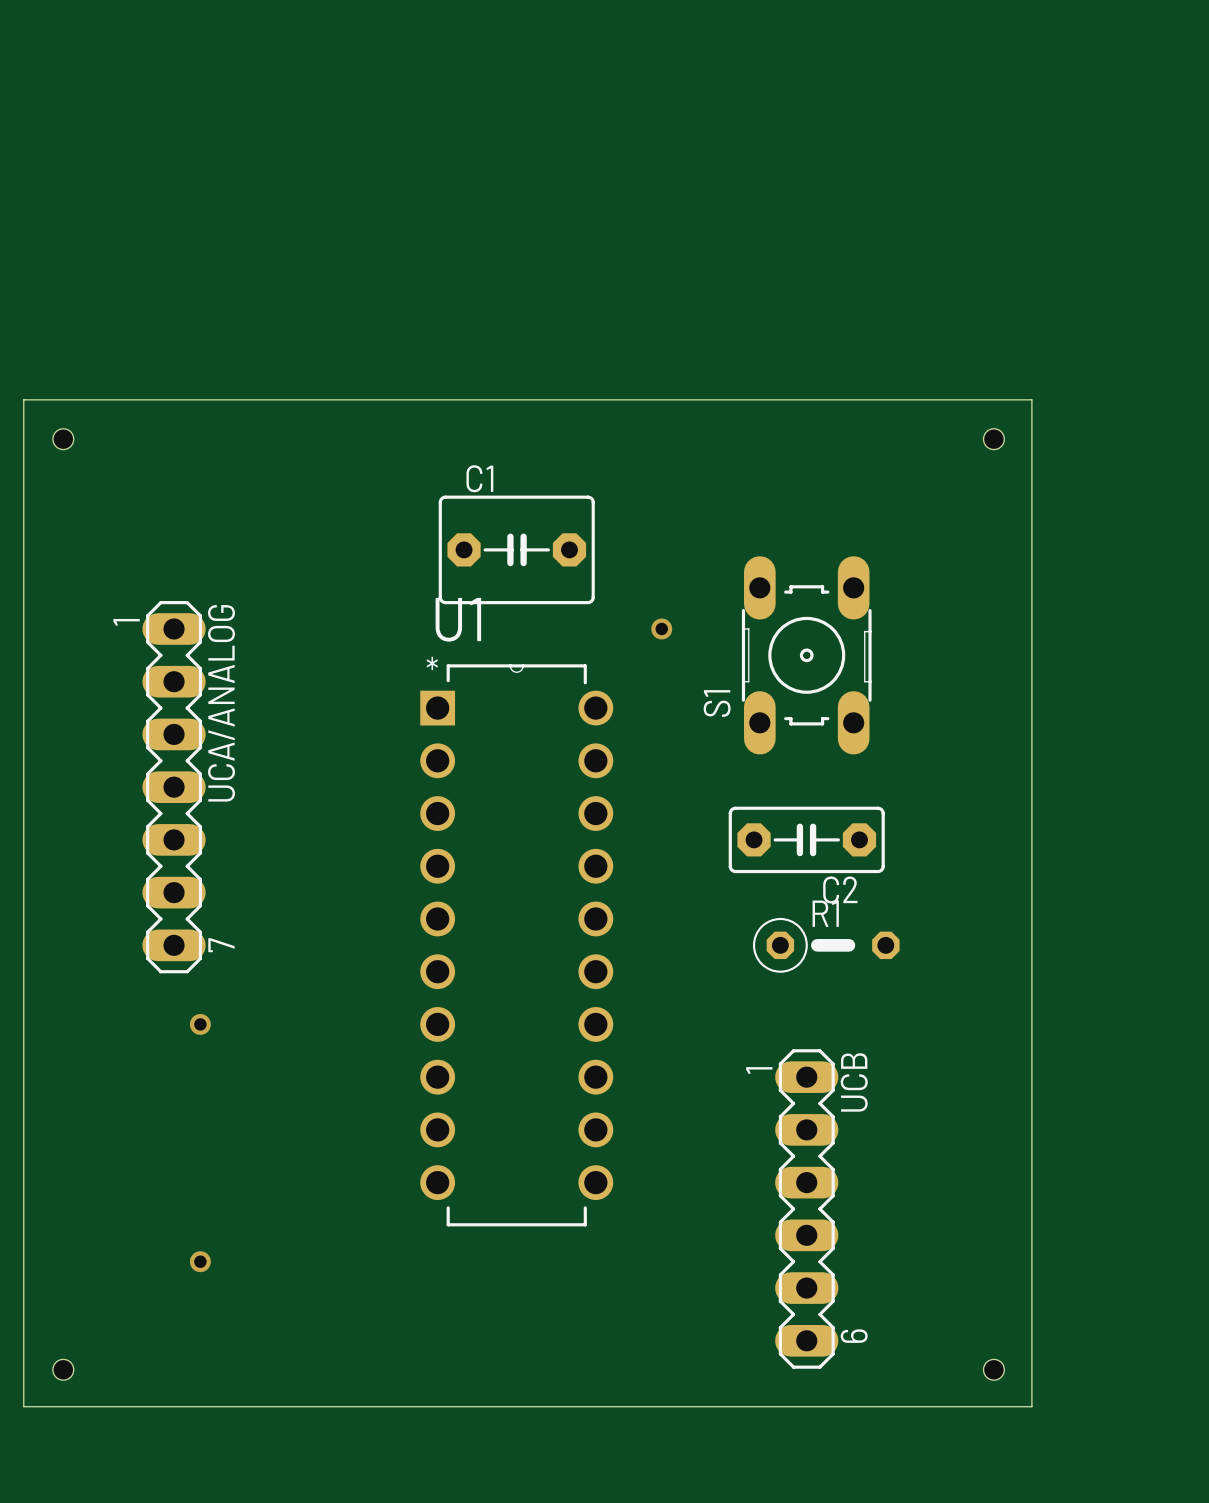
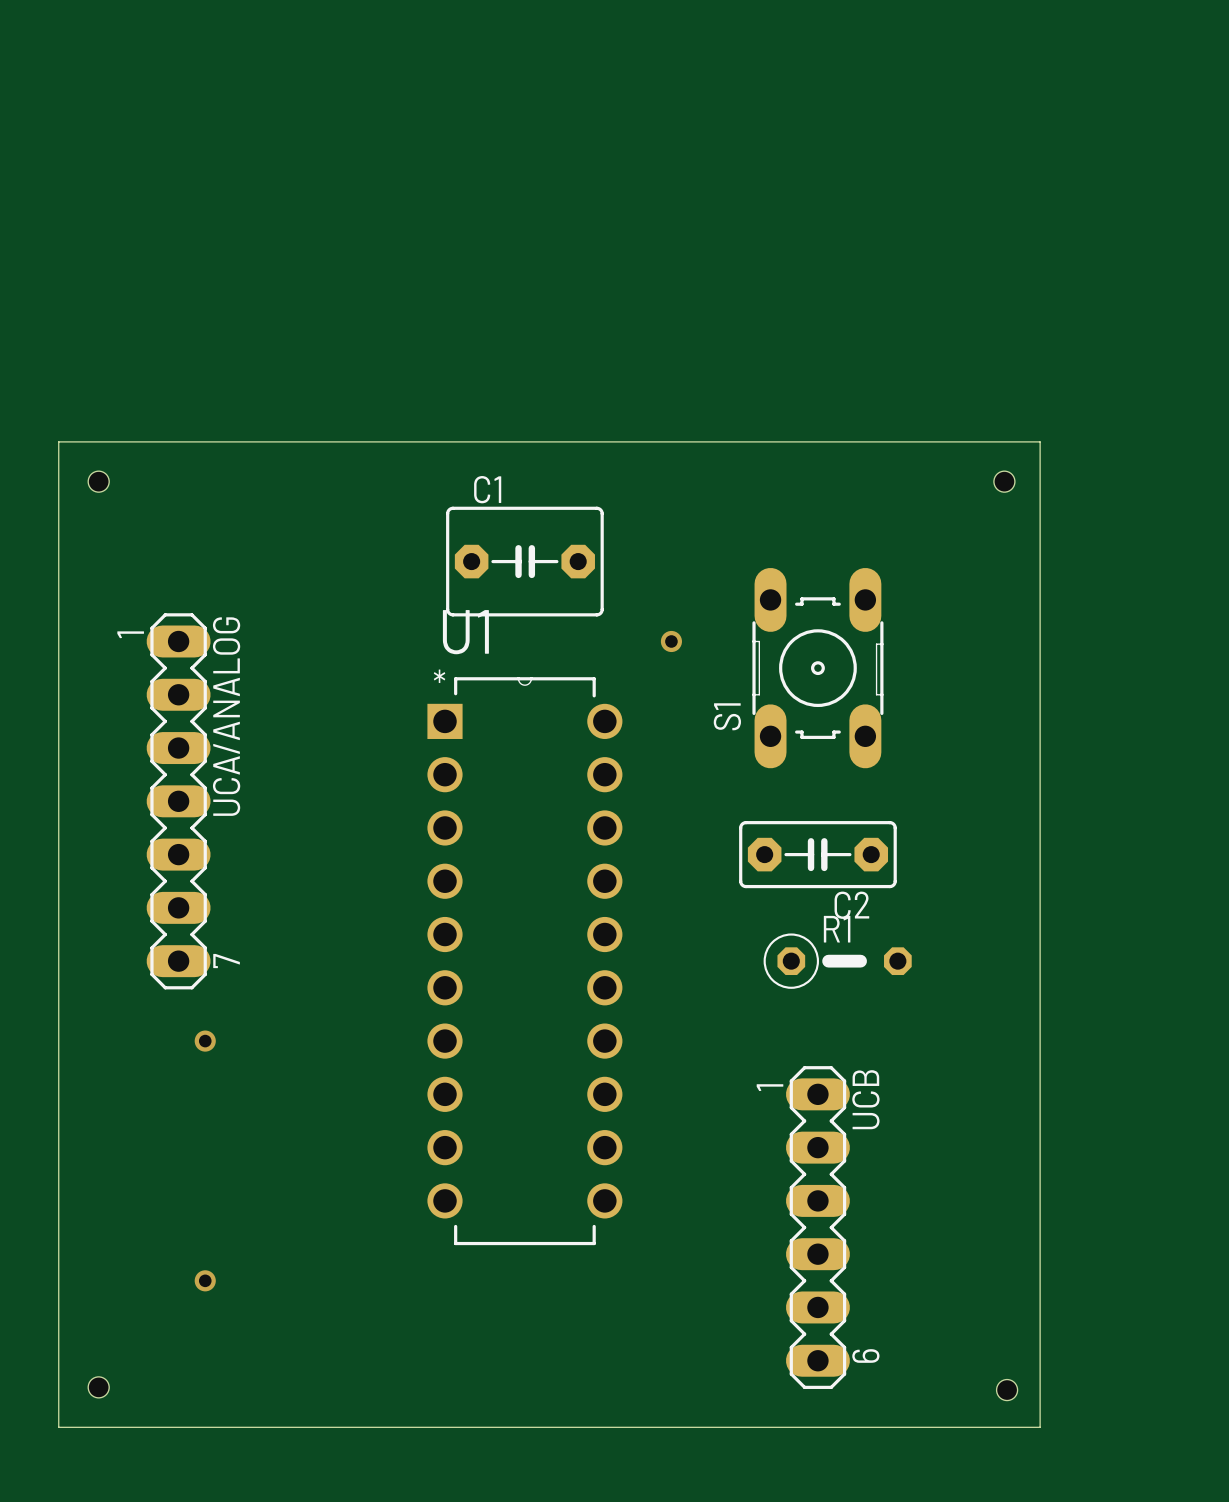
hole position: (63, 439) -> (98, 481)
hole position: (993, 439) -> (1004, 481)
hole position: (63, 1369) -> (98, 1387)
board edge: (55, 1406) (23, 1406) (23, 399) (1031, 399) (1031, 1406) (1026, 1406) -> (58, 1427) (58, 441) (1040, 441) (1040, 1427)

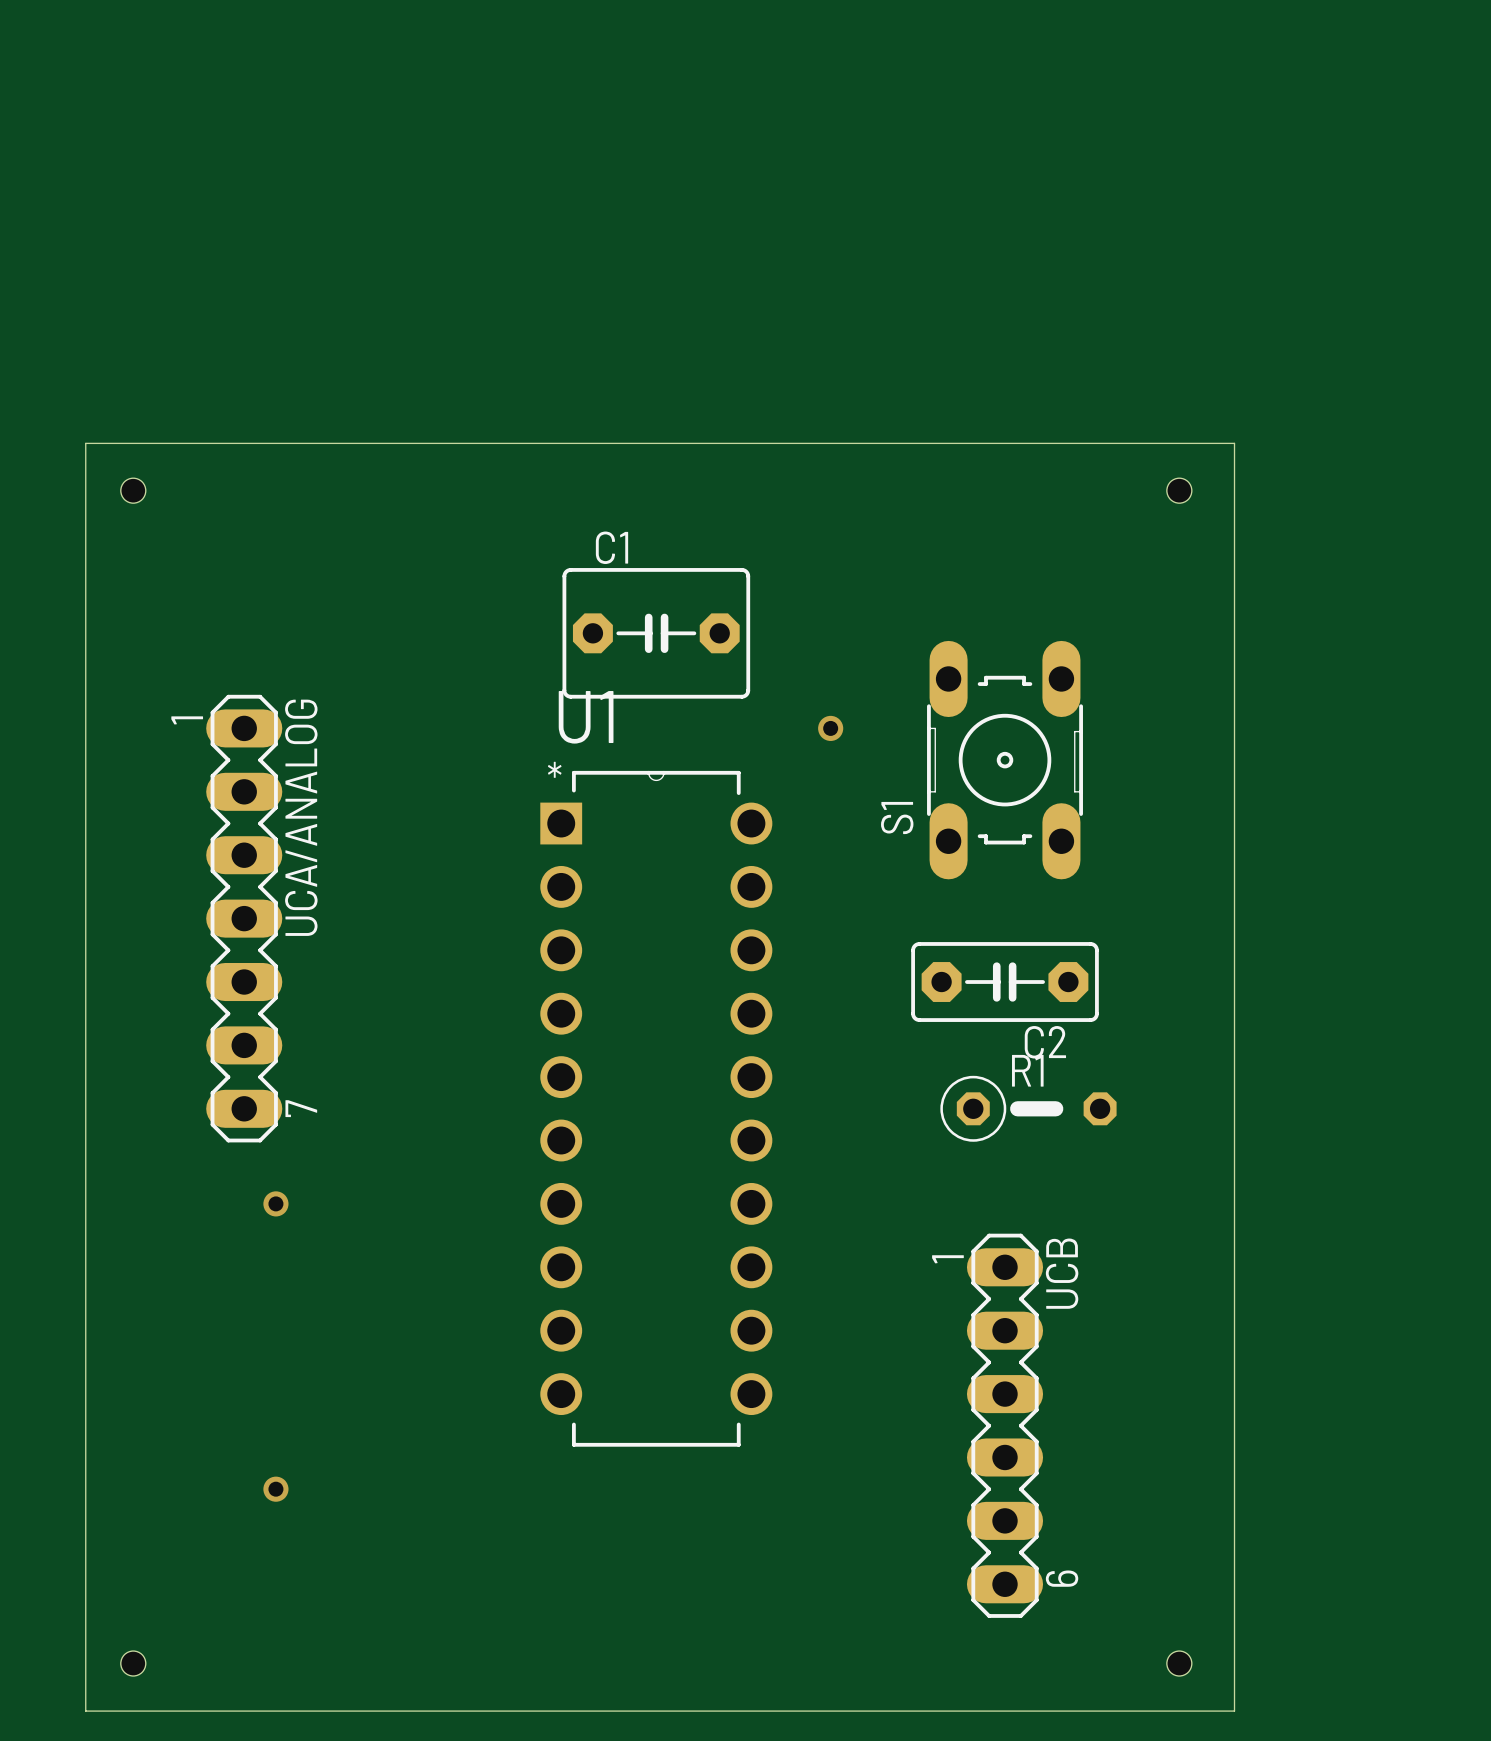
board edge: (58, 441) (1040, 441) (1040, 1427) (58, 1427) (58, 441) -> (85, 443) (85, 1711) (1234, 1711) (1234, 443) (85, 443)
hole position: (98, 481) -> (133, 490)
hole position: (1004, 481) -> (1179, 490)
hole position: (98, 1387) -> (133, 1663)
hole position: (1007, 1390) -> (1179, 1663)

